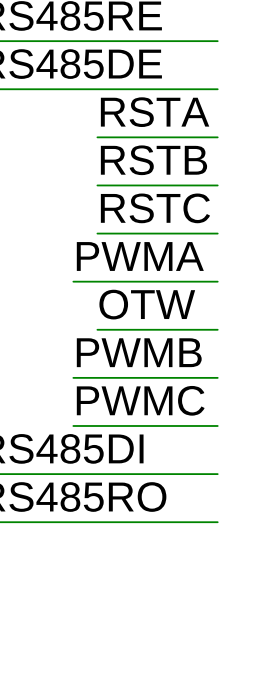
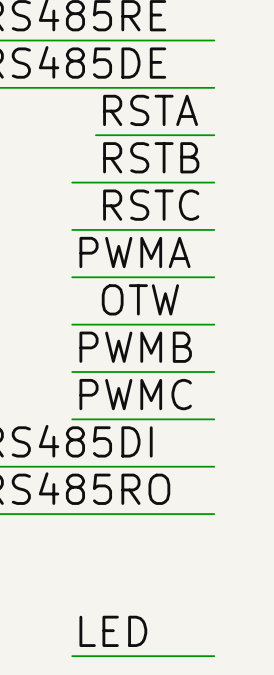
wire: none -> (72, 182) (95, 182)
wire: none -> (72, 229) (95, 229)
wire: none -> (72, 324) (95, 324)
label: none -> LED (113, 631)
wire: none -> (72, 656) (214, 656)

